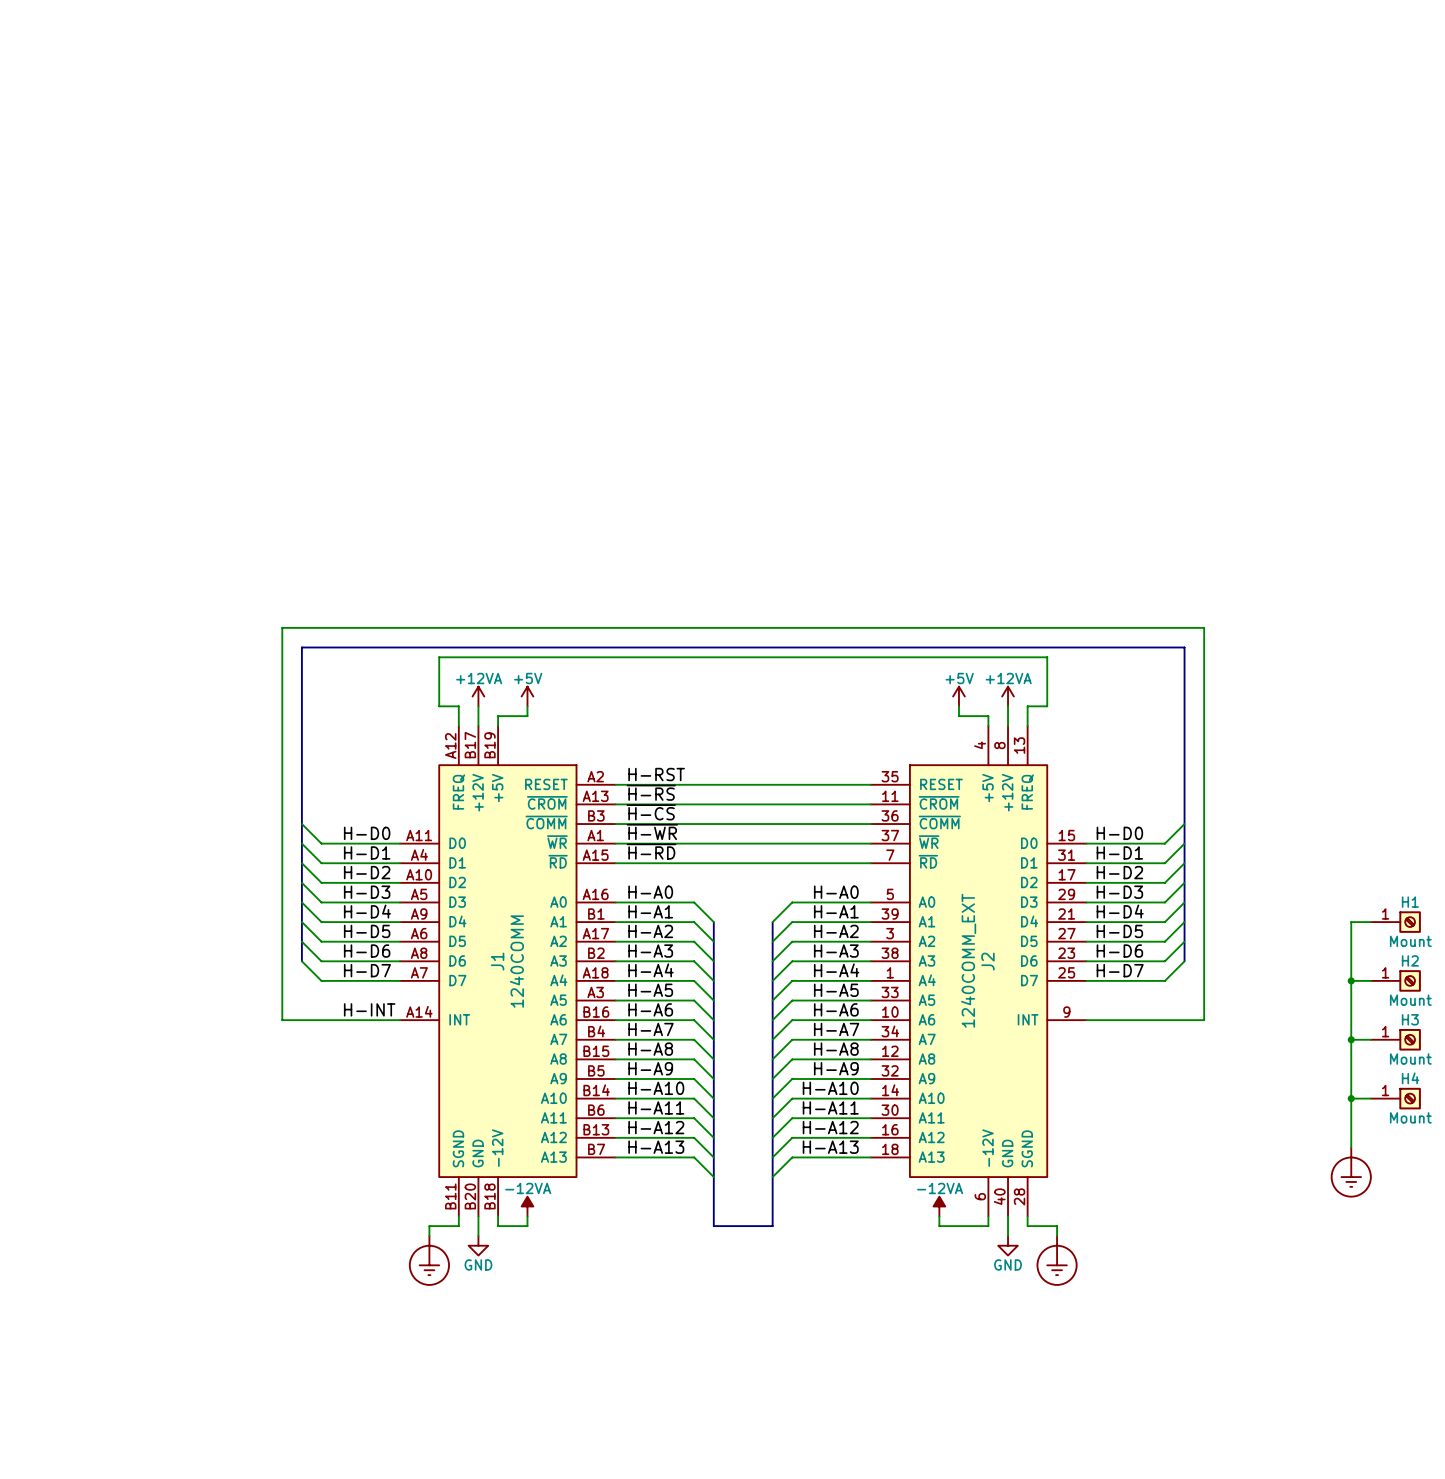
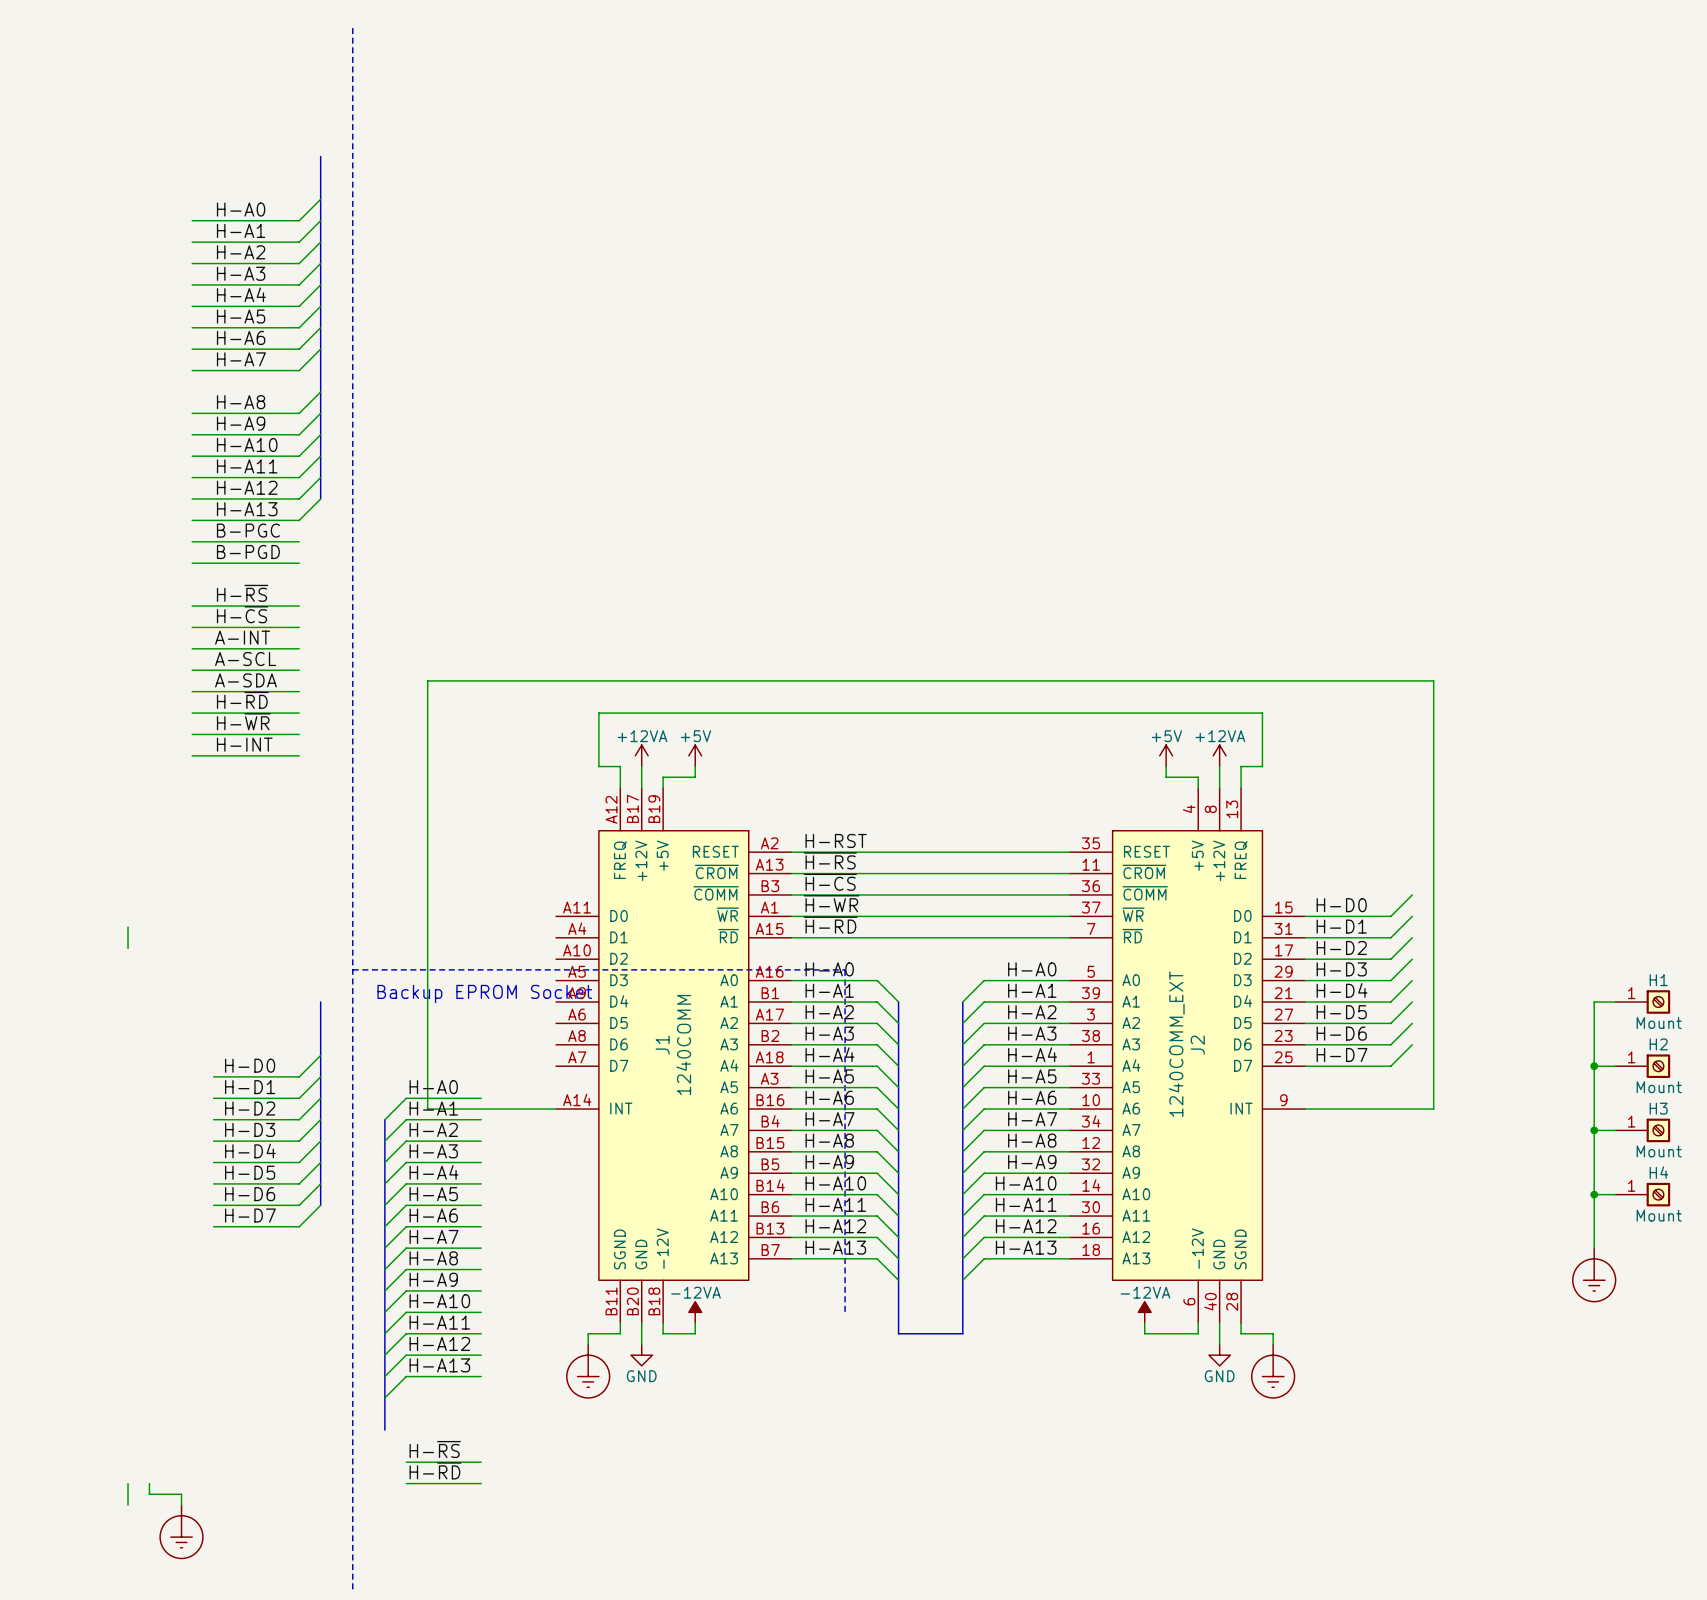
line: none -> (352, 28) (352, 1590)
bus: none -> (320, 156) (320, 498)
wire: none -> (320, 199) (299, 220) (192, 220)
label: none -> H-A0 (241, 209)
wire: none -> (320, 220) (299, 242) (192, 242)
label: none -> H-A1 (241, 230)
wire: none -> (320, 242) (299, 263) (192, 263)
label: none -> H-A2 (241, 252)
wire: none -> (320, 263) (299, 284) (192, 284)
label: none -> H-A3 (241, 273)
wire: none -> (320, 284) (299, 306) (192, 306)
label: none -> H-A4 (241, 294)
wire: none -> (320, 306) (299, 327) (192, 327)
label: none -> H-A5 (241, 316)
wire: none -> (320, 327) (299, 349) (192, 349)
label: none -> H-A6 (241, 337)
wire: none -> (320, 349) (299, 370) (192, 370)
label: none -> H-A7 (241, 359)
wire: none -> (320, 391) (299, 413) (192, 413)
label: none -> H-A8 (241, 402)
wire: none -> (320, 413) (299, 434) (192, 434)
label: none -> H-A9 (241, 423)
wire: none -> (320, 434) (299, 456) (192, 456)
label: none -> H-A10 (247, 444)
wire: none -> (320, 456) (299, 477) (192, 477)
label: none -> H-A11 (247, 466)
wire: none -> (320, 477) (299, 498) (192, 498)
label: none -> H-A12 (247, 487)
wire: none -> (320, 498) (299, 520) (192, 520)
label: none -> H-A13 (247, 509)
label: none -> B-PGC (248, 530)
wire: none -> (192, 541) (299, 541)
label: none -> B-PGD (248, 552)
wire: none -> (192, 563) (299, 563)
label: none -> H-~{RS} (242, 593)
wire: none -> (192, 606) (299, 606)
label: none -> H-~{CS} (242, 614)
wire: none -> (192, 627) (299, 627)
label: none -> A-INT (242, 637)
wire: none -> (192, 648) (299, 648)
label: none -> A-SCL (245, 659)
wire: none -> (192, 670) (299, 670)
label: none -> A-SDA (245, 680)
wire: none -> (192, 691) (299, 691)
label: none -> H-~{RD} (242, 700)
wire: none -> (192, 713) (299, 713)
label: none -> H-~{WR} (243, 721)
wire: none -> (192, 734) (299, 734)
label: none -> H-INT (244, 744)
wire: none -> (192, 755) (299, 755)
wire: (301, 824) (321, 843) (399, 843) -> none
label: H-D0 (367, 833) -> none
wire: (301, 843) (321, 863) (399, 863) -> none
label: H-D1 (367, 852) -> none
wire: none -> (128, 927) (128, 948)
wire: (301, 863) (321, 882) (399, 882) -> none
label: H-D2 (367, 872) -> none
wire: (301, 882) (321, 902) (399, 902) -> none
line: none -> (352, 969) (845, 969) (845, 1312)
label: H-D3 (367, 892) -> none
wire: (301, 902) (321, 922) (399, 922) -> none
label: H-D4 (367, 911) -> none
text: none -> Backup EPROM Socket (484, 994)
bus: none -> (320, 1001) (320, 1205)
wire: (301, 922) (321, 941) (399, 941) -> none
label: H-D5 (367, 931) -> none
wire: (301, 941) (321, 961) (399, 961) -> none
label: H-D6 (367, 951) -> none
wire: (301, 961) (321, 980) (399, 980) -> none
bus: (301, 961) (301, 647) (1184, 647) (1184, 961) -> none
label: H-D7 (367, 970) -> none
wire: none -> (320, 1055) (299, 1076) (213, 1076)
label: none -> H-D0 (250, 1065)
wire: none -> (320, 1076) (299, 1098) (213, 1098)
label: none -> H-D1 (250, 1087)
label: none -> H-A0 (433, 1087)
label: H-INT (369, 1009) -> none
wire: none -> (320, 1098) (299, 1119) (213, 1119)
wire: none -> (481, 1098) (406, 1098) (384, 1119)
label: none -> H-D2 (250, 1108)
label: none -> H-A1 (433, 1108)
wire: none -> (320, 1119) (299, 1141) (213, 1141)
bus: none -> (384, 1119) (384, 1430)
wire: none -> (481, 1119) (406, 1119) (384, 1141)
label: none -> H-D3 (250, 1129)
label: none -> H-A2 (433, 1129)
wire: none -> (320, 1141) (299, 1162) (213, 1162)
wire: none -> (481, 1141) (406, 1141) (384, 1162)
label: none -> H-D4 (250, 1151)
label: none -> H-A3 (433, 1151)
wire: none -> (320, 1162) (299, 1183) (213, 1183)
wire: none -> (481, 1162) (406, 1162) (384, 1183)
label: none -> H-D5 (250, 1172)
label: none -> H-A4 (434, 1172)
wire: none -> (320, 1183) (299, 1205) (213, 1205)
wire: none -> (481, 1183) (406, 1183) (384, 1205)
label: none -> H-D6 (250, 1194)
label: none -> H-A5 (433, 1194)
wire: none -> (320, 1205) (299, 1226) (213, 1226)
wire: none -> (481, 1205) (406, 1205) (384, 1226)
label: none -> H-D7 (250, 1215)
label: none -> H-A6 (433, 1215)
wire: none -> (481, 1226) (406, 1226) (384, 1248)
label: none -> H-A7 (434, 1236)
wire: none -> (481, 1248) (406, 1248) (384, 1269)
label: none -> H-A8 (433, 1258)
wire: none -> (481, 1269) (406, 1269) (384, 1290)
label: none -> H-A9 (433, 1279)
wire: none -> (481, 1290) (406, 1290) (384, 1312)
label: none -> H-A10 (439, 1301)
wire: none -> (481, 1312) (406, 1312) (384, 1333)
label: none -> H-A11 (439, 1322)
wire: none -> (481, 1333) (406, 1333) (384, 1355)
label: none -> H-A12 (439, 1343)
wire: none -> (481, 1355) (406, 1355) (384, 1376)
label: none -> H-A13 (439, 1365)
wire: none -> (481, 1376) (406, 1376) (384, 1397)
label: none -> H-~{RS} (435, 1449)
wire: none -> (406, 1462) (481, 1462)
label: none -> H-~{RD} (435, 1470)
wire: none -> (128, 1483) (128, 1504)
wire: none -> (149, 1483) (149, 1494) (181, 1494) (181, 1504)
wire: none -> (406, 1483) (481, 1483)
power symbol: none -> (181, 1531)

